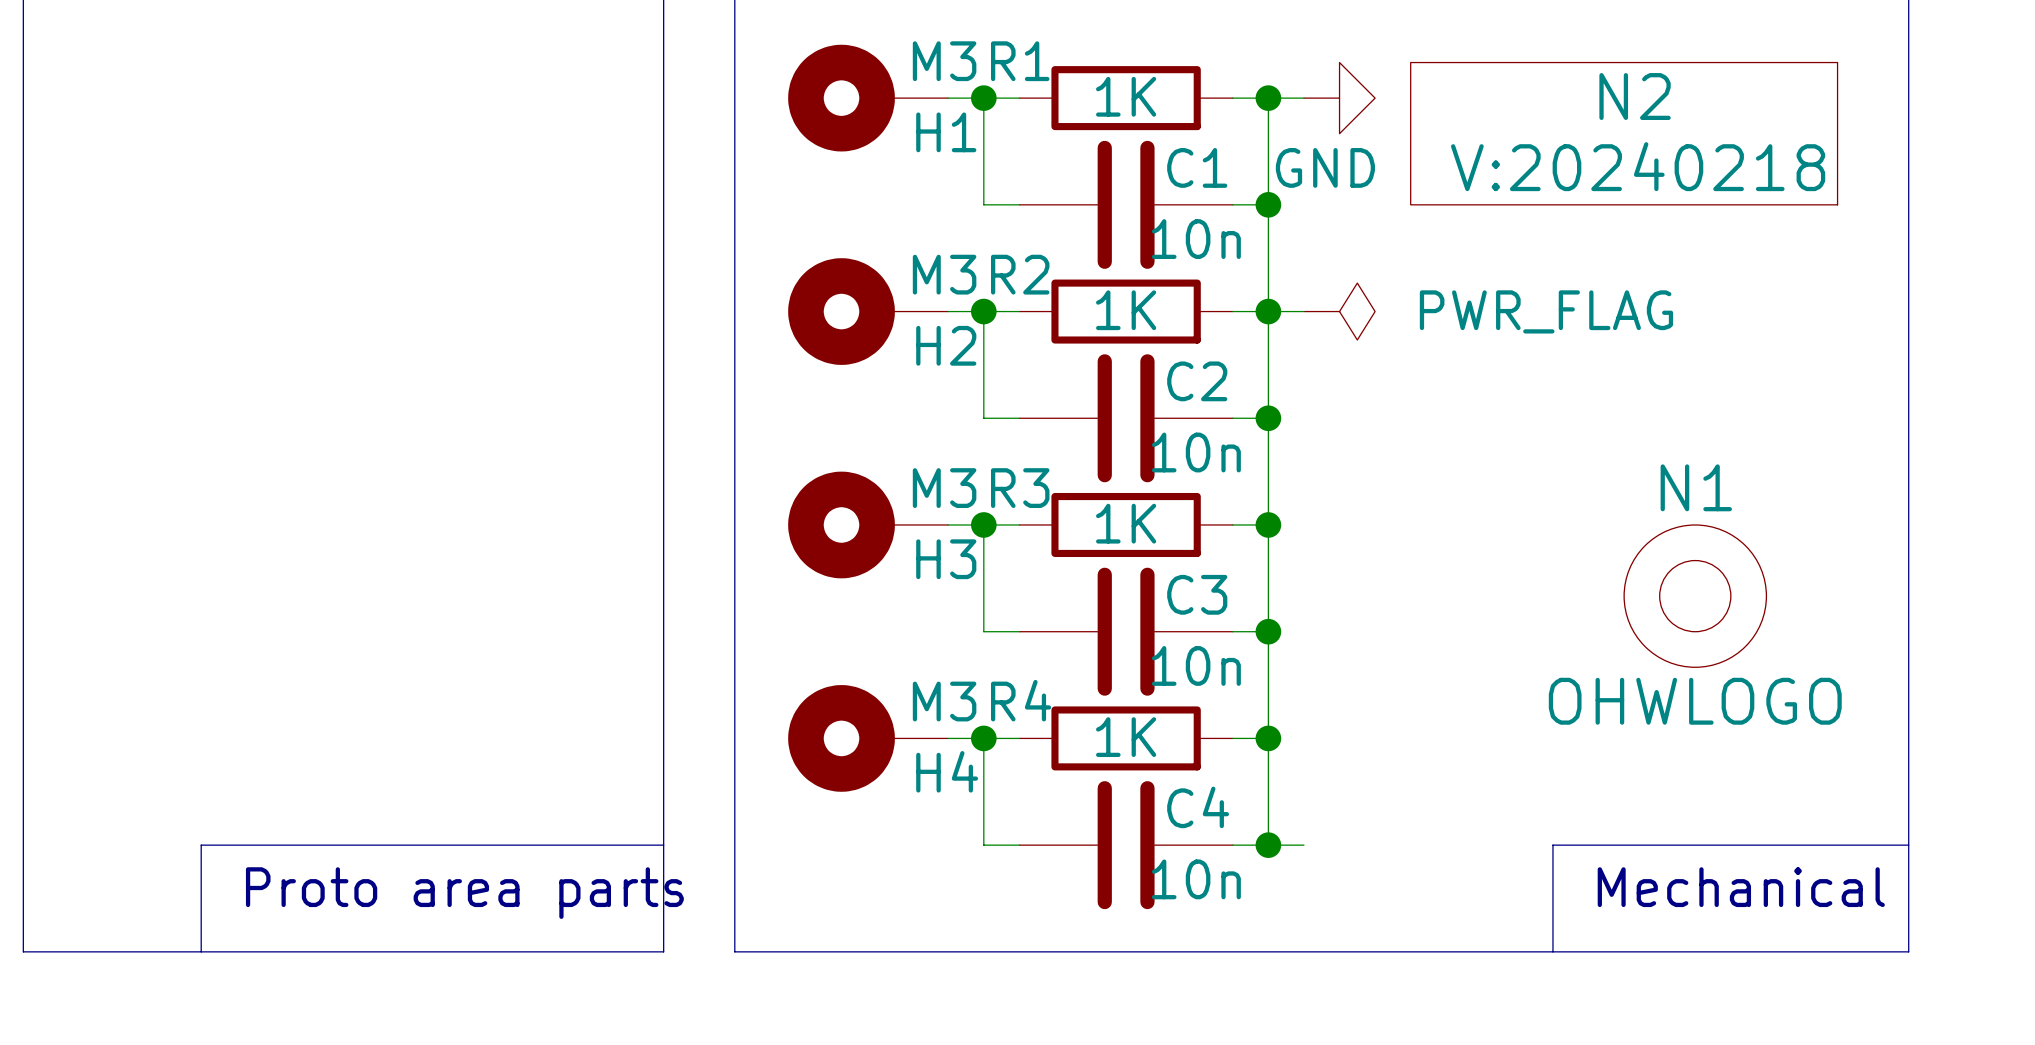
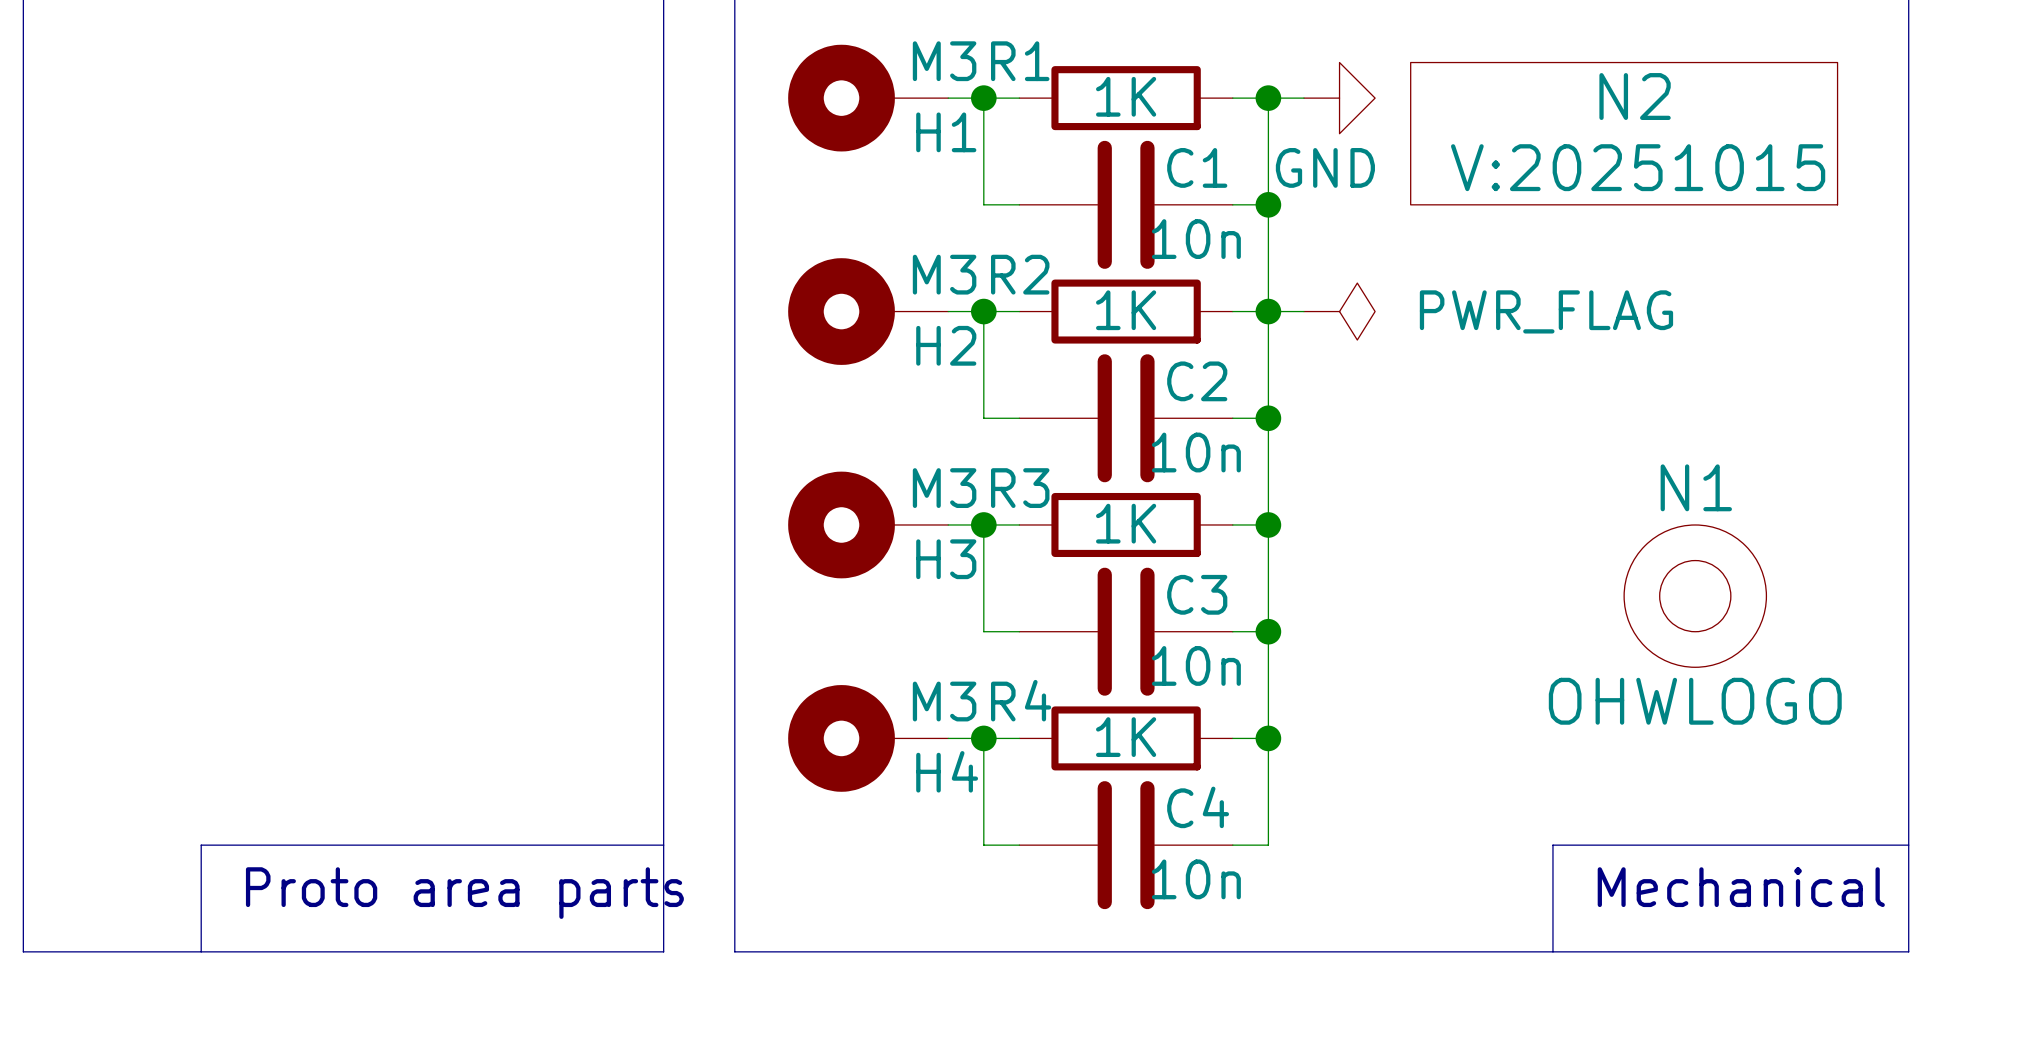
N2 value: V:20240218 (1638, 166) -> V:20251015 (1638, 167)
wire: (1268, 845) (1303, 845) -> none
junction: (1268, 845) -> none

